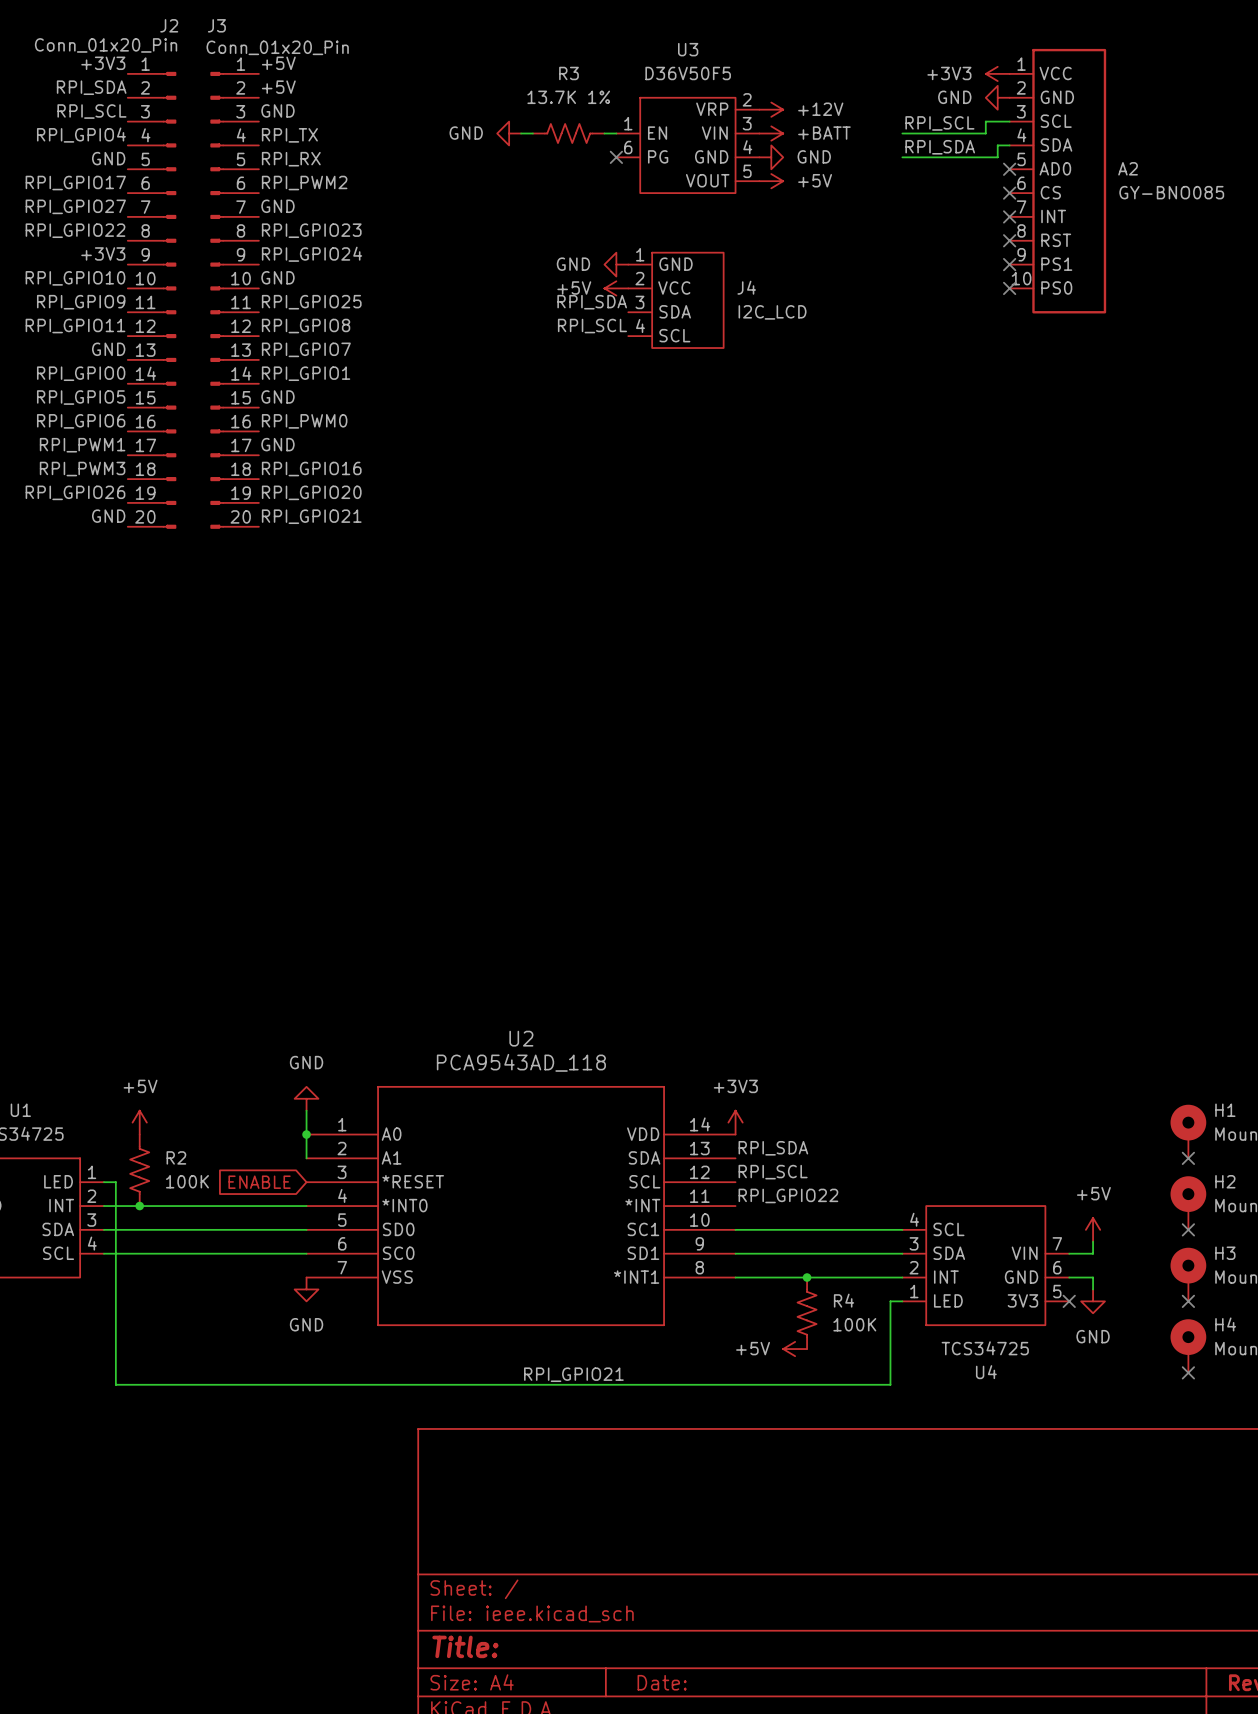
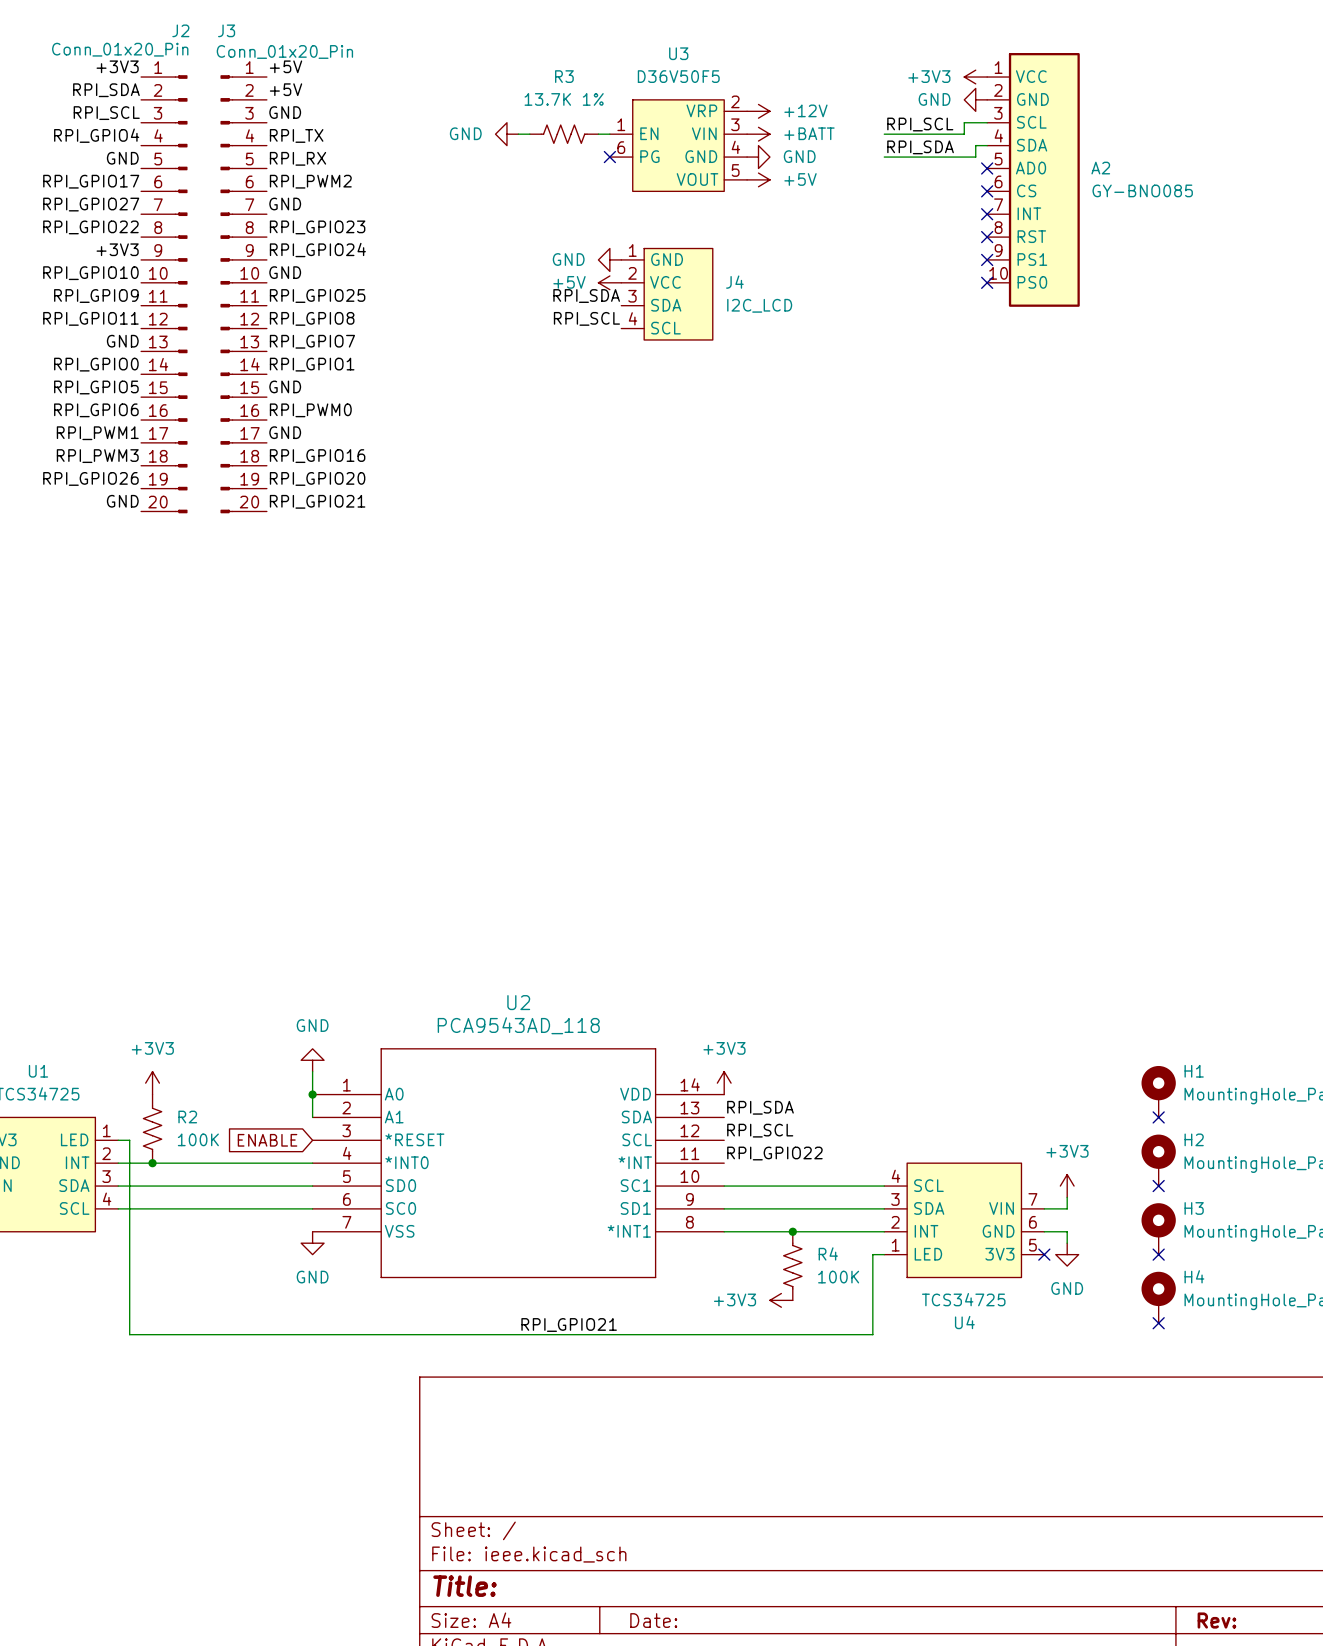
power symbol: +5V (139, 1122) -> +3V3 (152, 1083)
power symbol: +5V (1093, 1229) -> +3V3 (1067, 1186)
power symbol: +5V (795, 1349) -> +3V3 (781, 1300)

